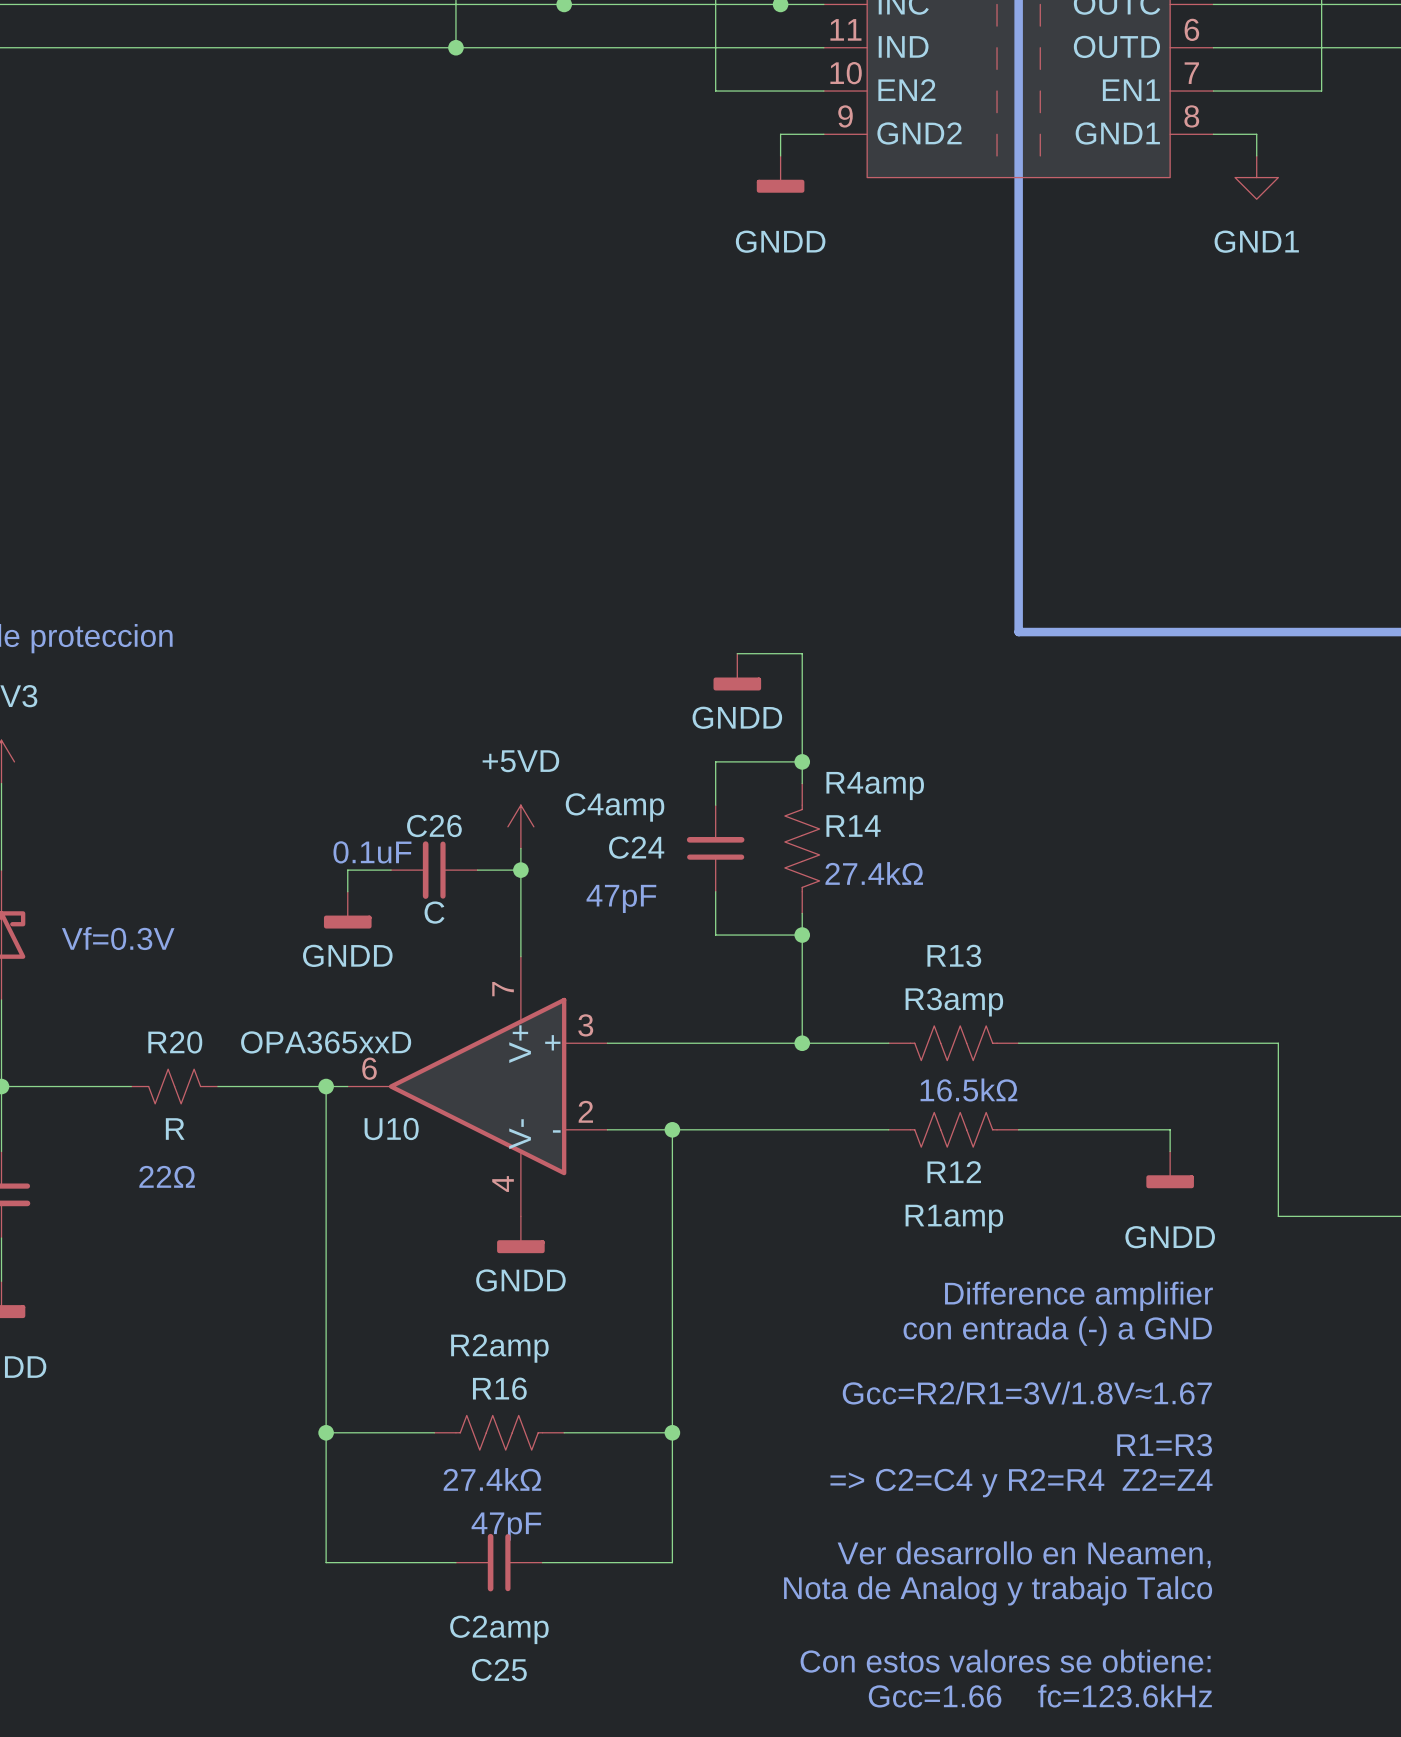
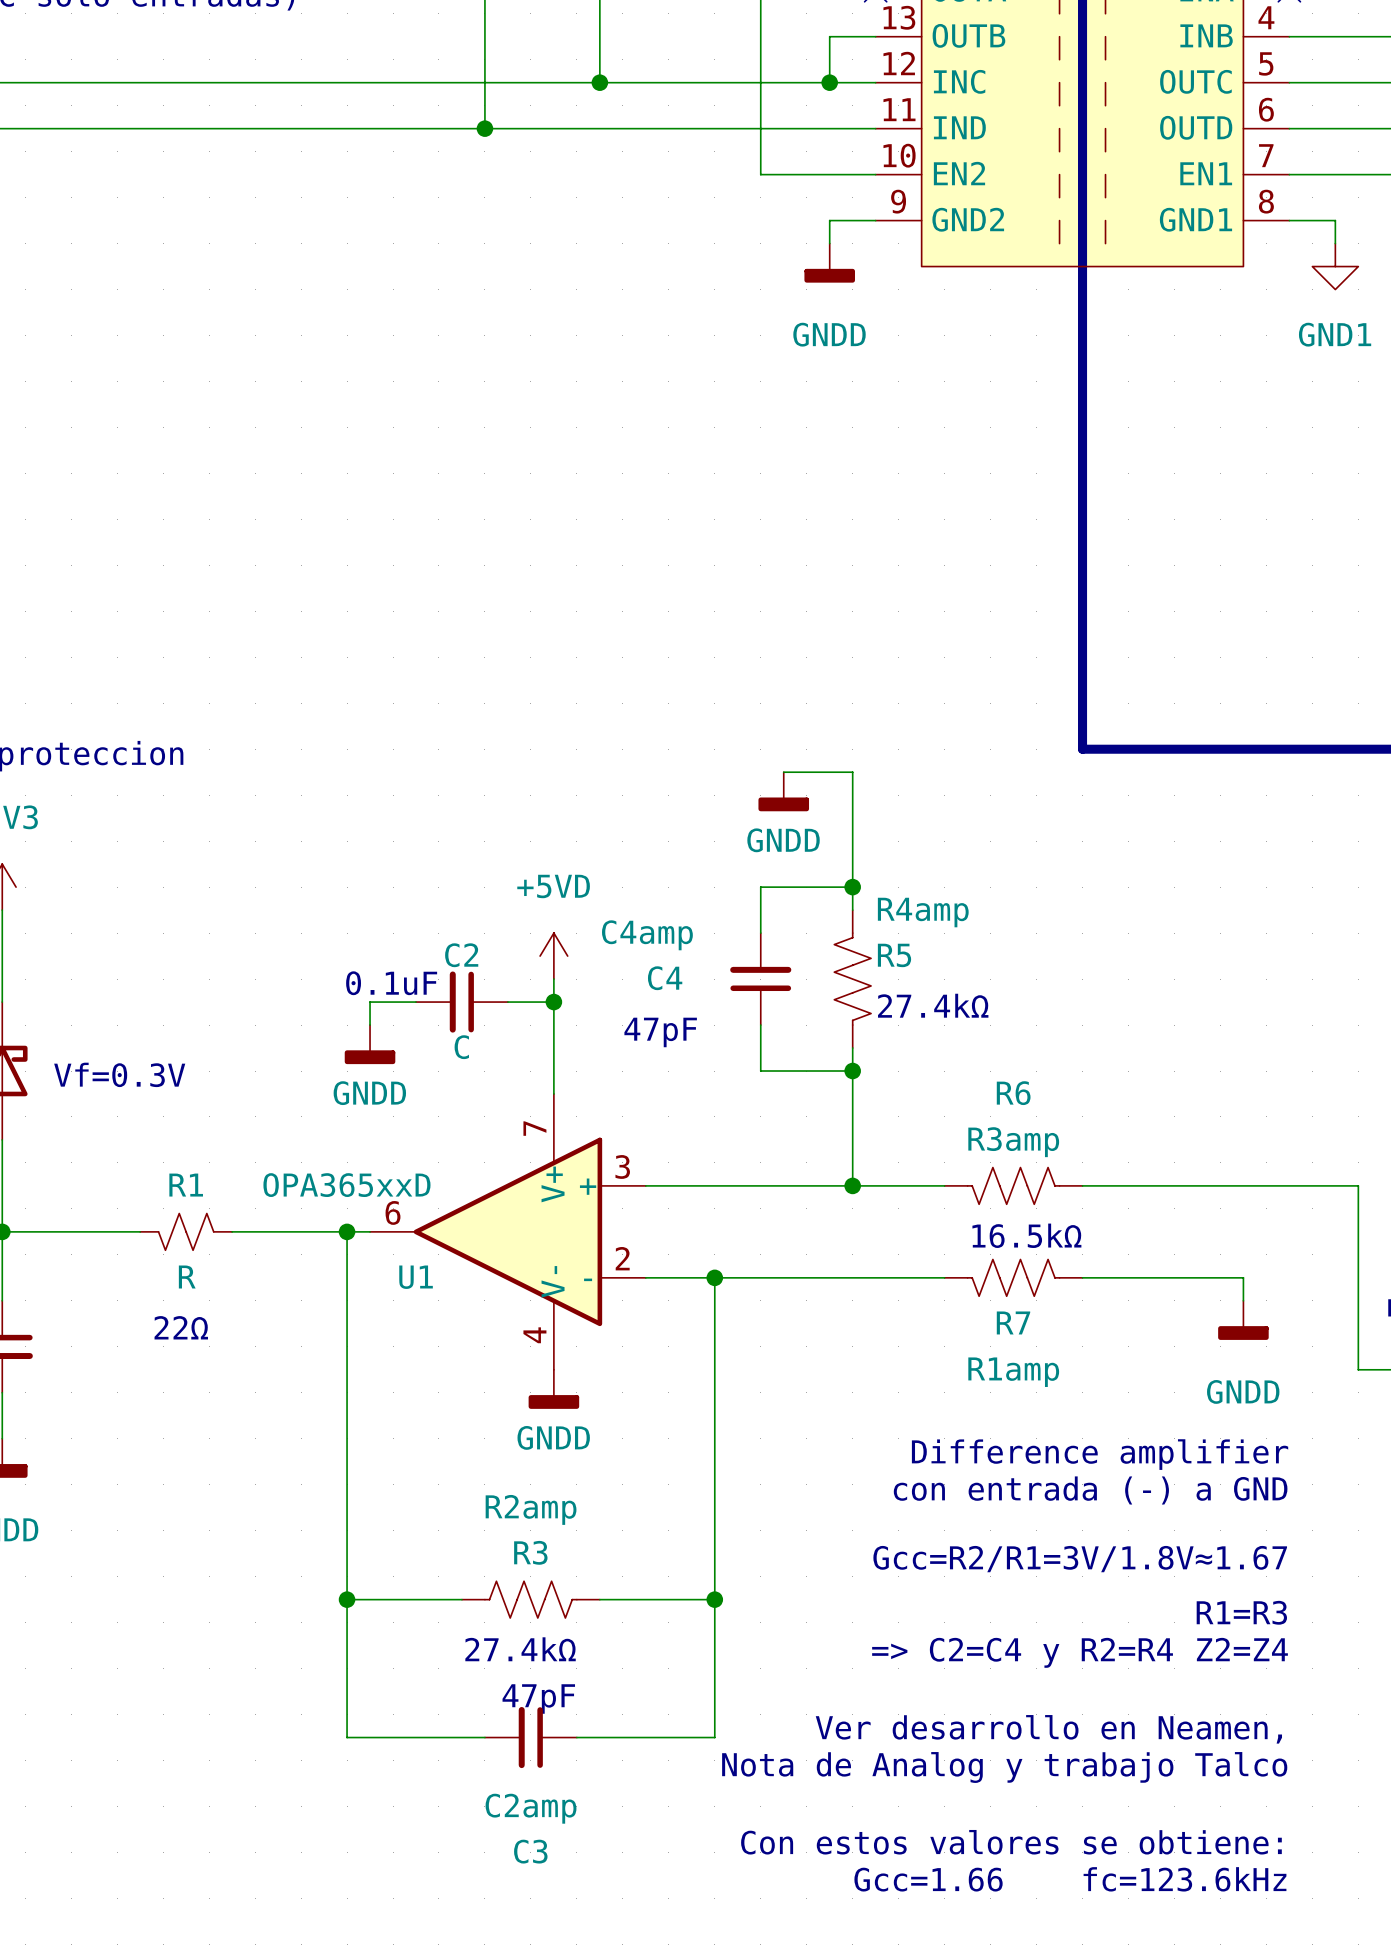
C26 name: C26 (434, 826) -> C2 (461, 955)
R14 name: R14 (853, 826) -> R5 (894, 955)
C24 name: C24 (636, 847) -> C4 (665, 978)
R13 name: R13 (954, 955) -> R6 (1013, 1093)
R20 name: R20 (175, 1042) -> R1 (186, 1185)
U10 name: U10 (391, 1128) -> U1 (416, 1277)
R12 name: R12 (954, 1172) -> R7 (1013, 1322)
R16 name: R16 (499, 1388) -> R3 (530, 1552)
C25 name: C25 (499, 1670) -> C3 (530, 1851)

